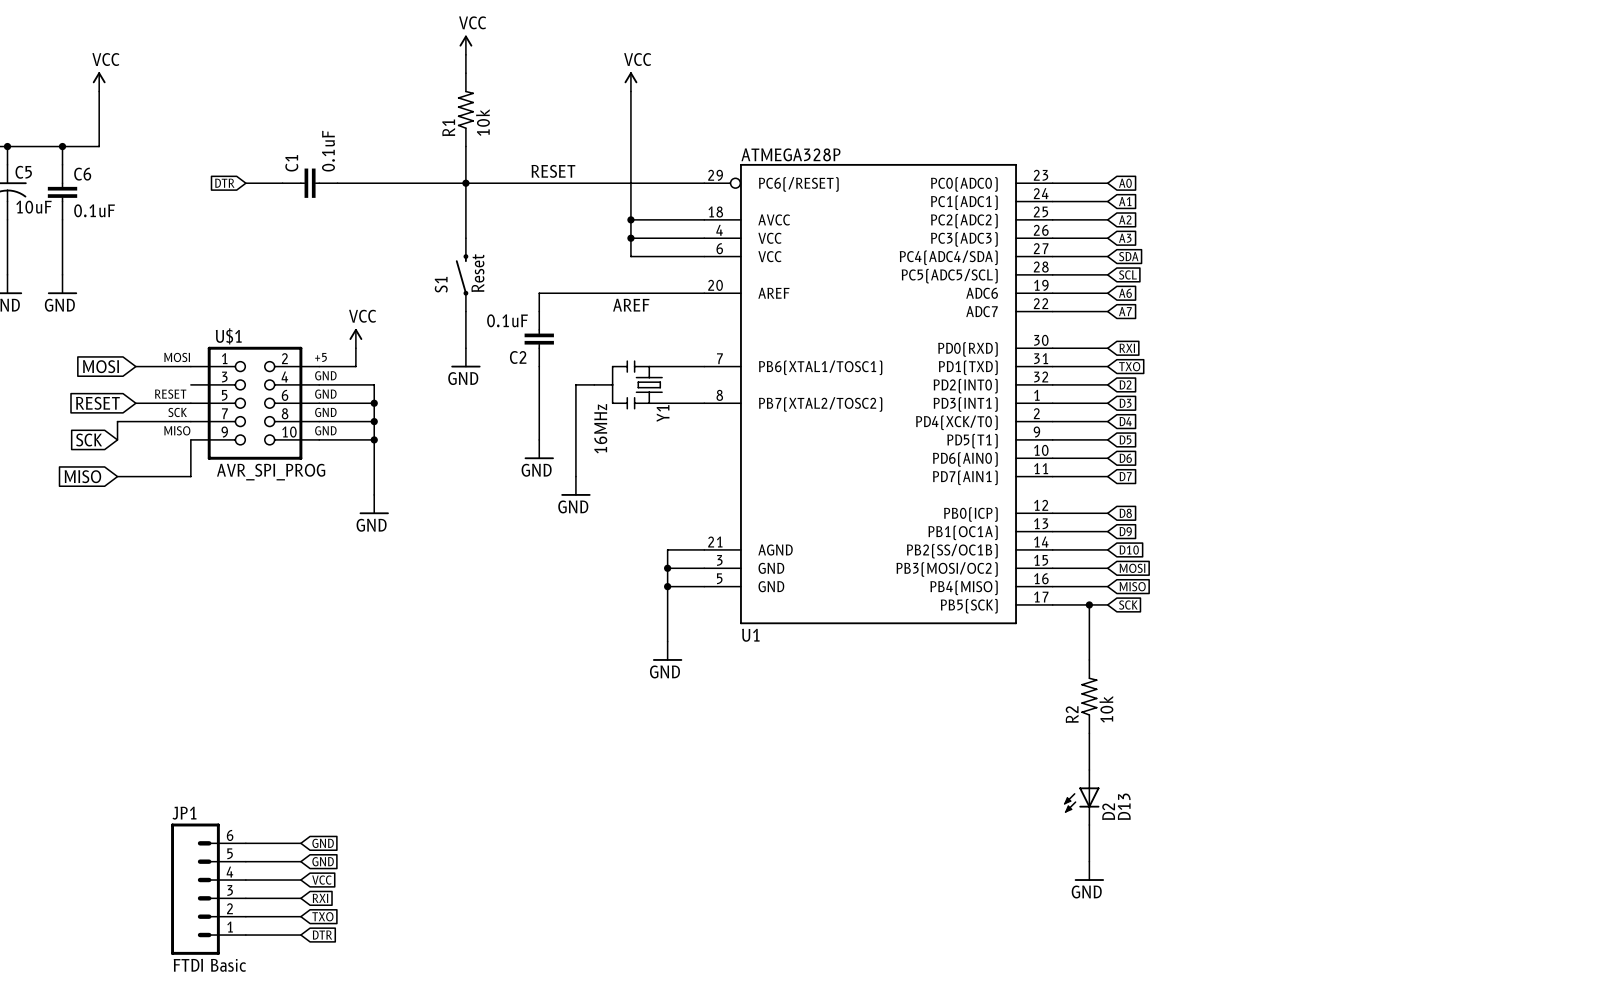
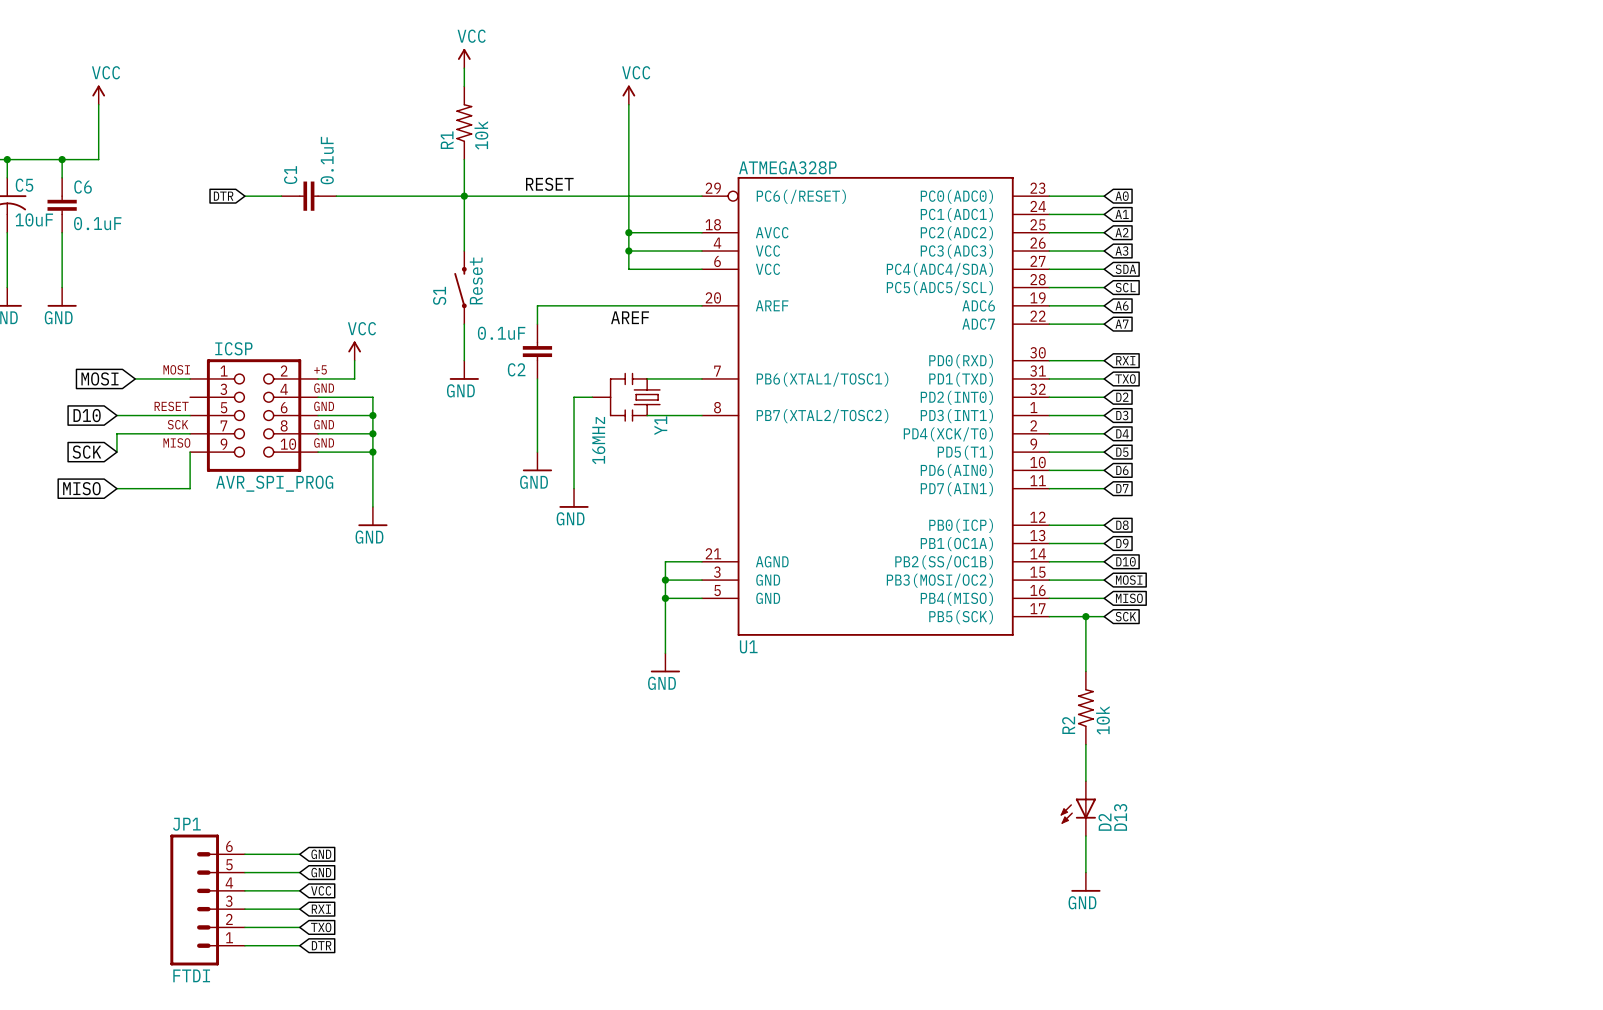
U$1 name: U$1 (228, 336) -> ICSP (233, 348)
global label: none -> D10 (87, 415)
global label: RESET (97, 403) -> none
wire: none -> (116, 415) (135, 415)
JP1 value: FTDI Basic (209, 965) -> FTDI (191, 975)

